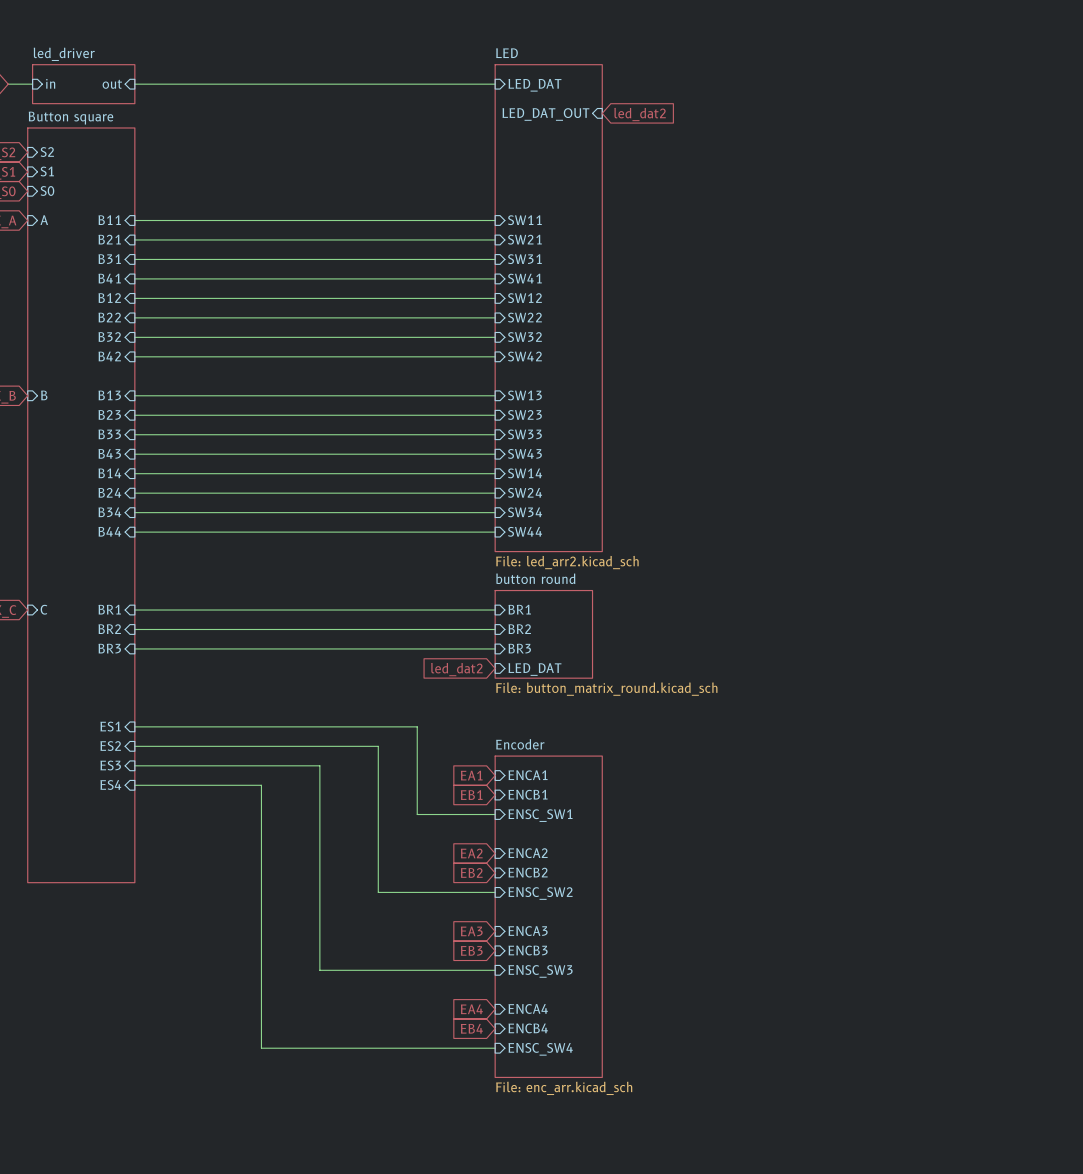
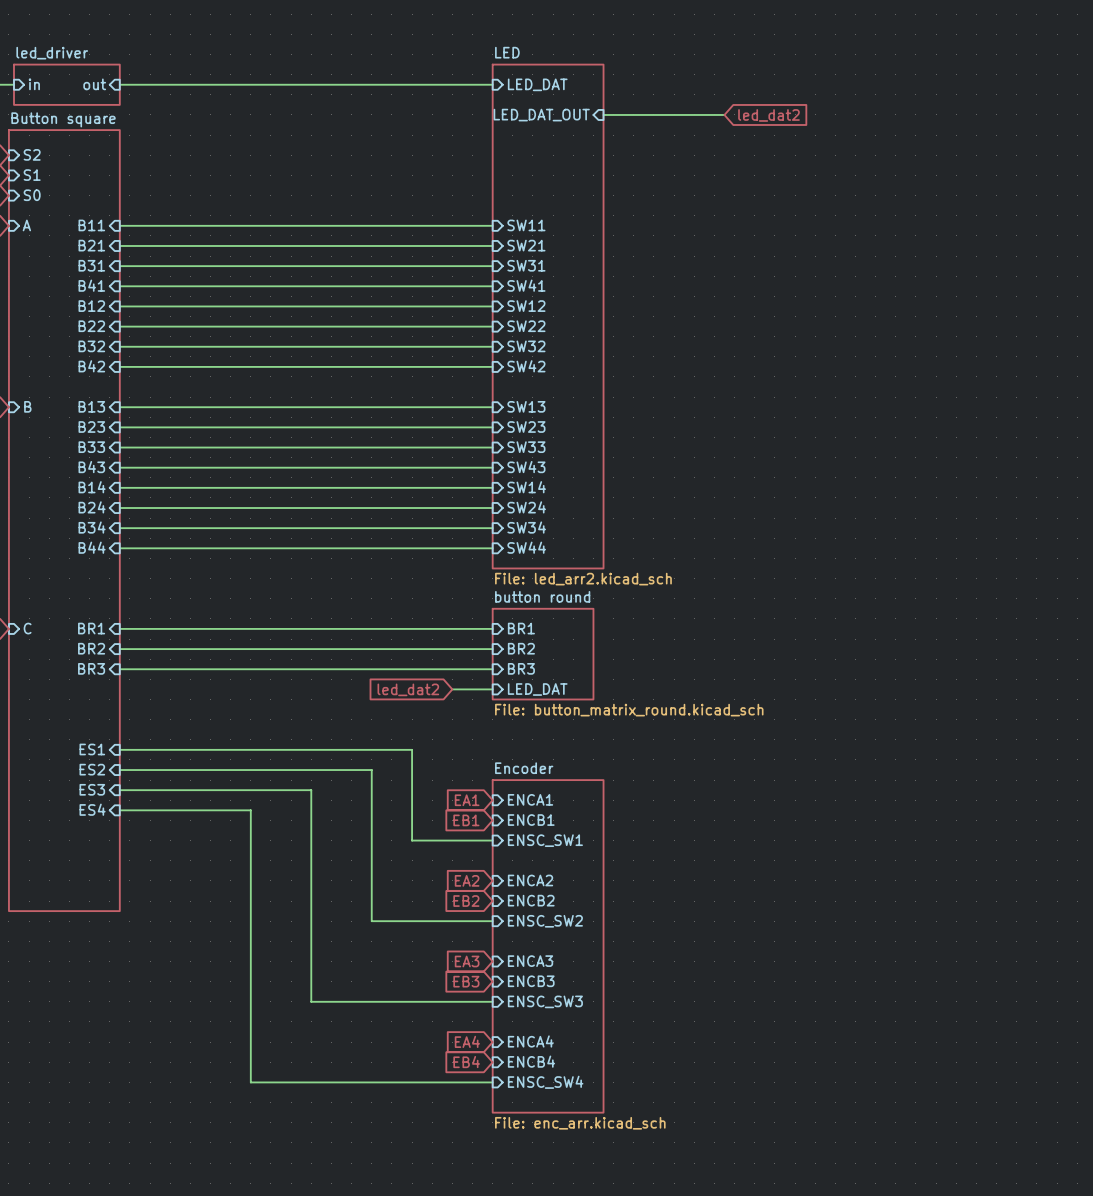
wire: none -> (603, 114) (724, 114)
global label position: led_dat2 (640, 114) -> led_dat2 (768, 115)
wire: none -> (452, 689) (492, 689)
global label position: led_dat2 (456, 669) -> led_dat2 (408, 689)

